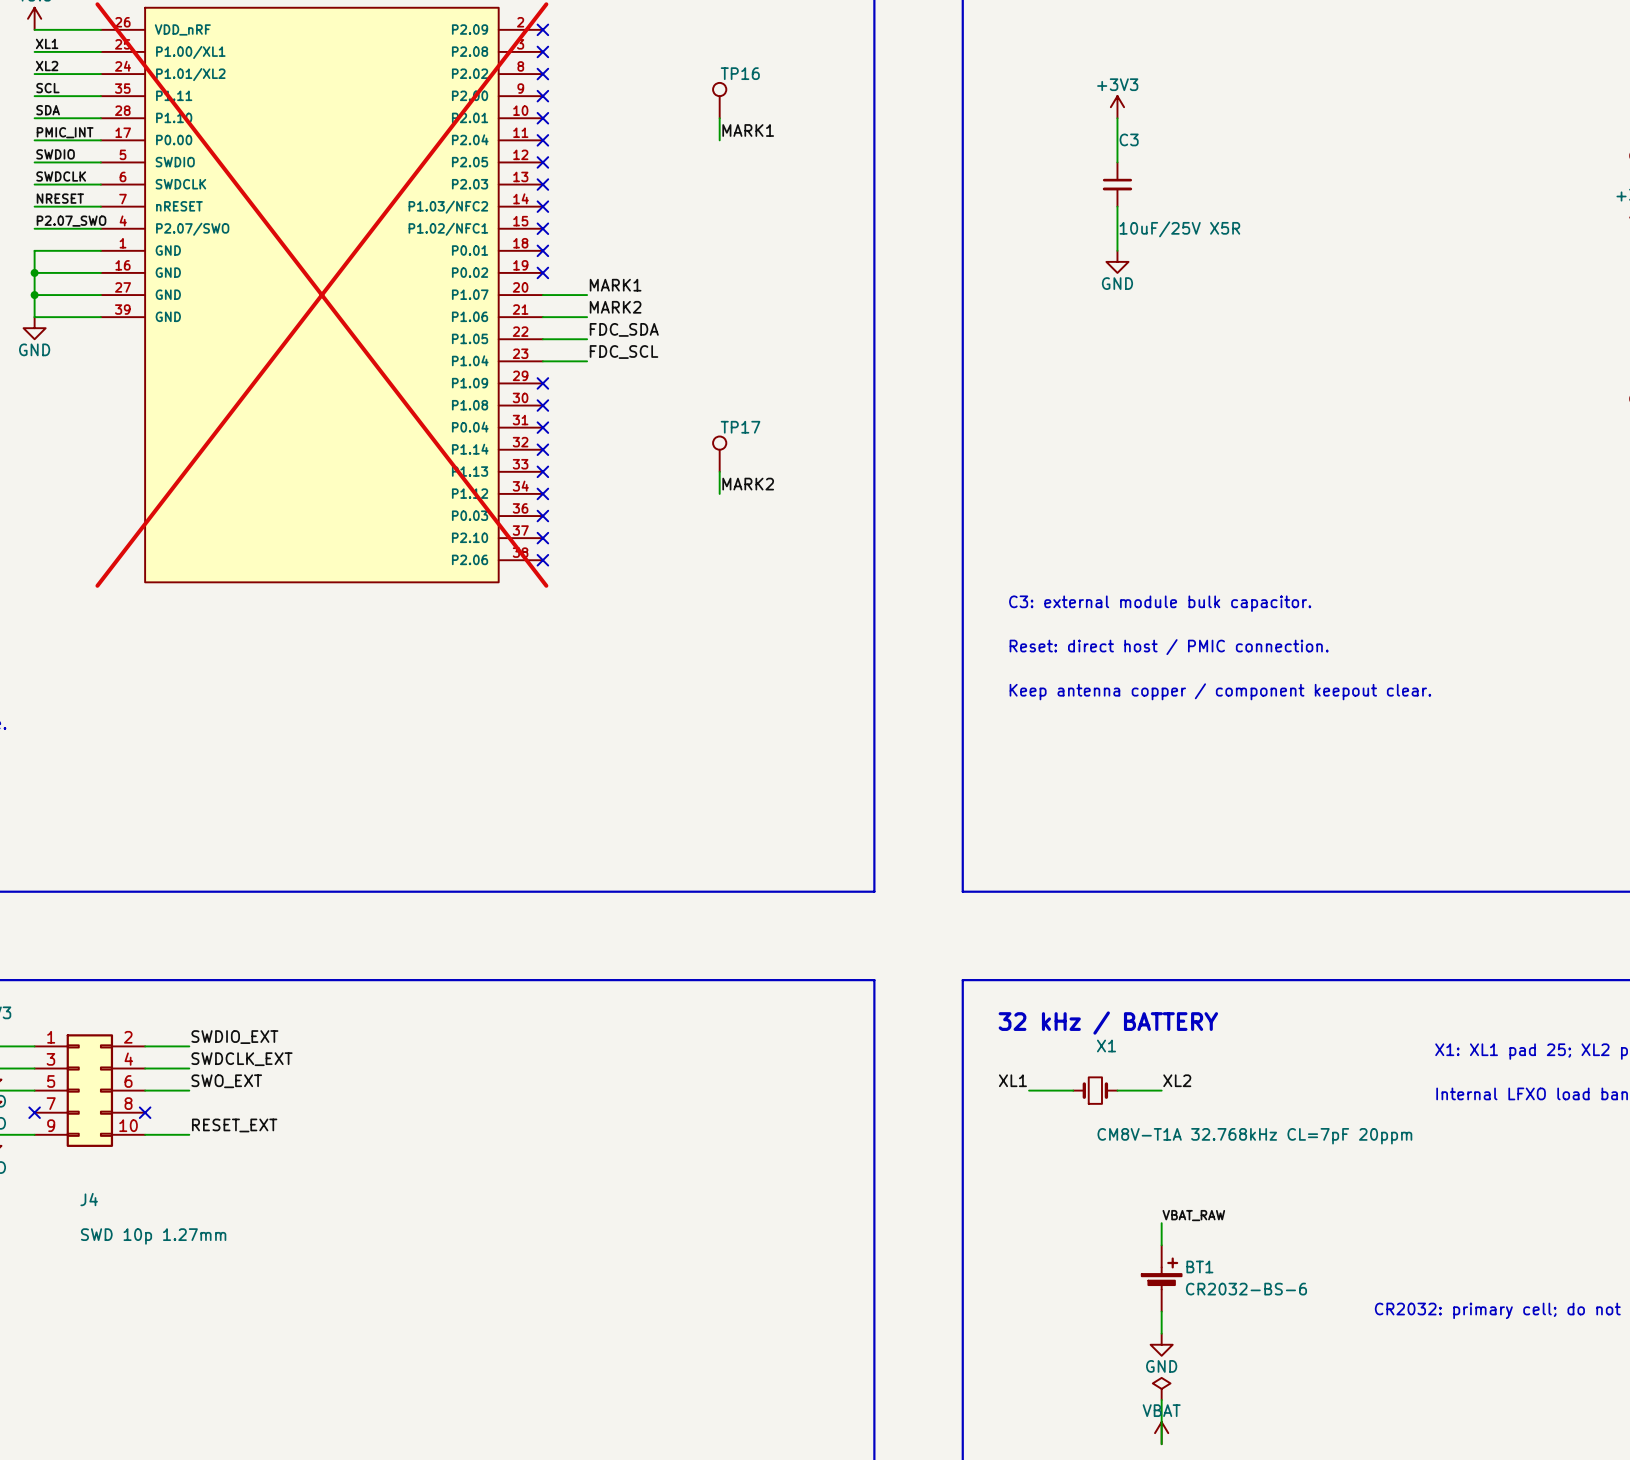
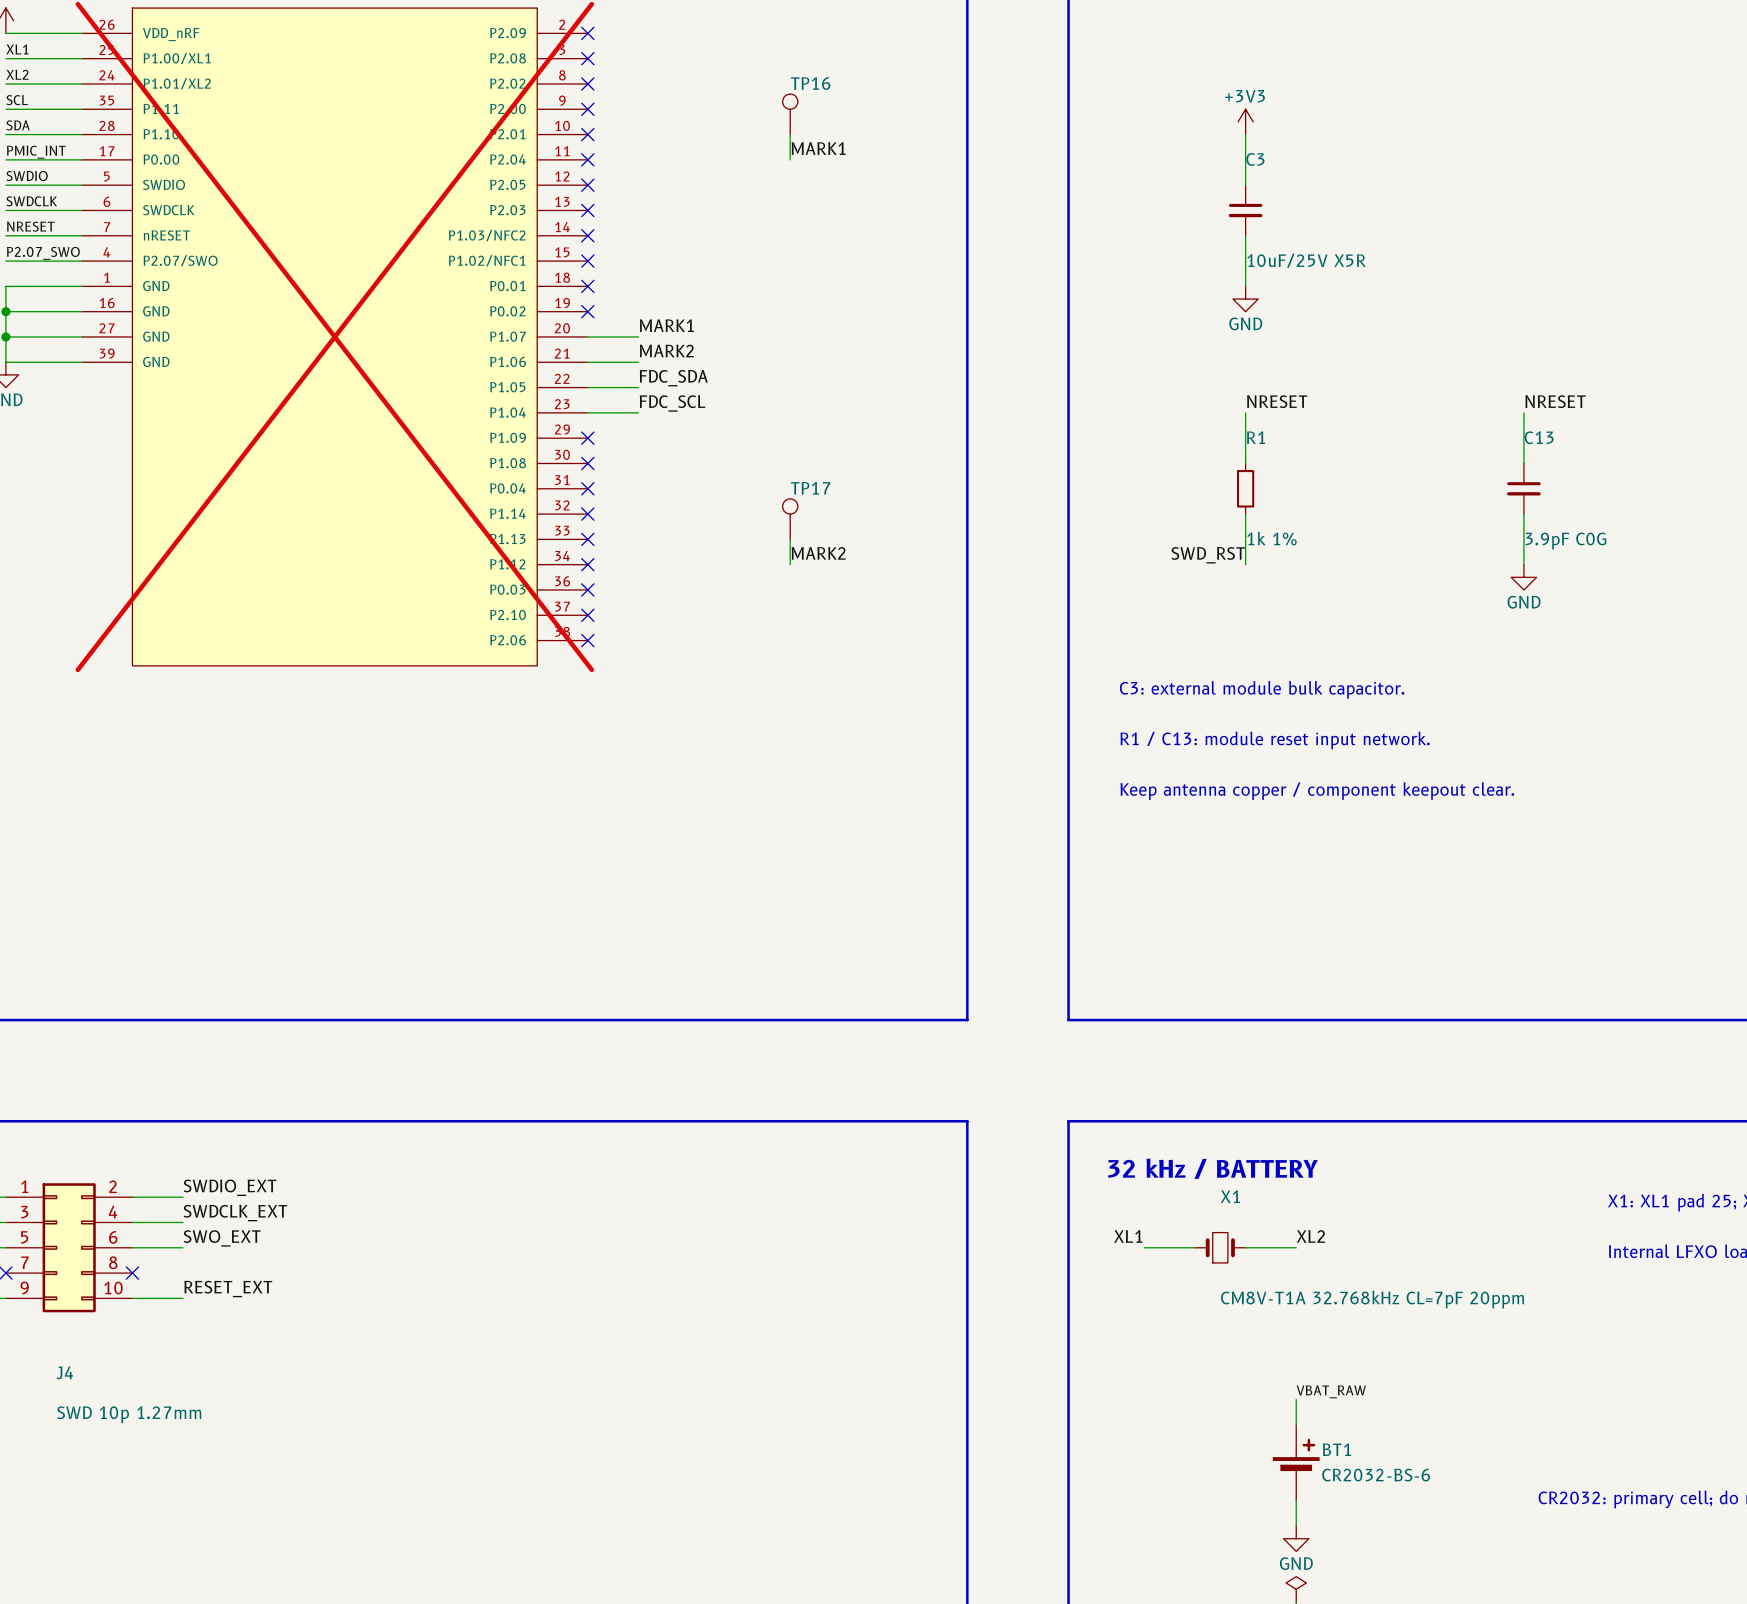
label: none -> NRESET (1277, 401)
label: none -> NRESET (1555, 401)
wire: none -> (1245, 412) (1245, 463)
wire: none -> (1523, 412) (1523, 463)
R1: none -> 1k 1% (1245, 488)
C13: none -> 3.9pF C0G (1523, 488)
wire: none -> (1245, 514) (1245, 564)
wire: none -> (1523, 514) (1523, 564)
label: none -> SWD_RST (1208, 555)
power symbol: none -> GND (1523, 577)
text: Reset: direct host / PMIC connection. (1169, 647) -> R1 / C13: module reset input network. (1275, 740)

